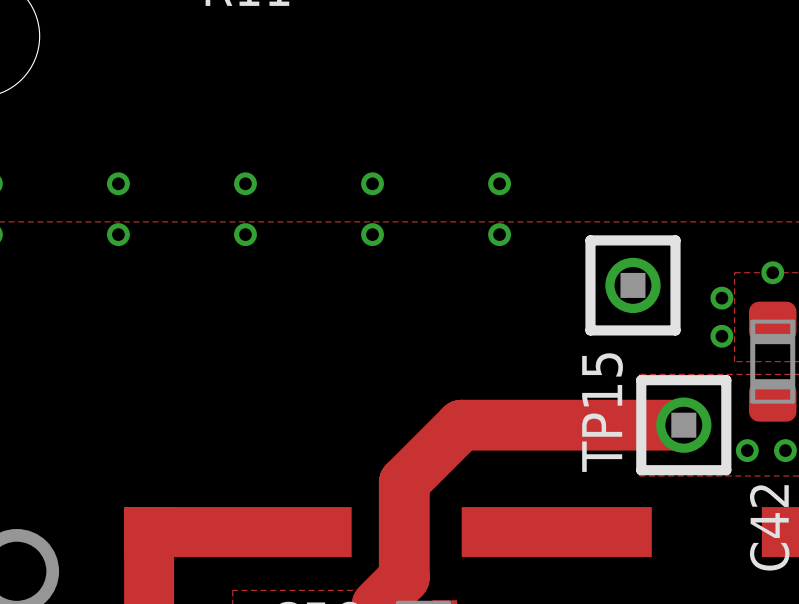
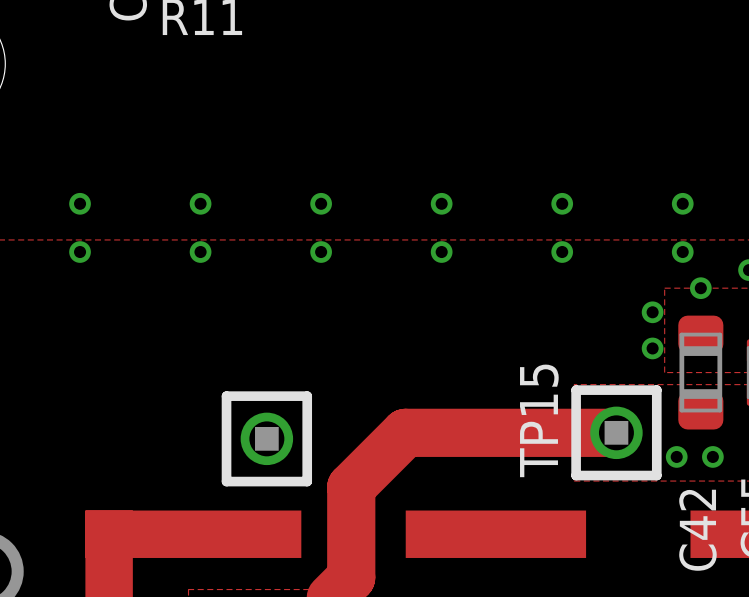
via: none -> (562, 203)
via: none -> (682, 203)
via: none -> (562, 252)
via: none -> (682, 252)
part position: (632, 285) -> (266, 438)

